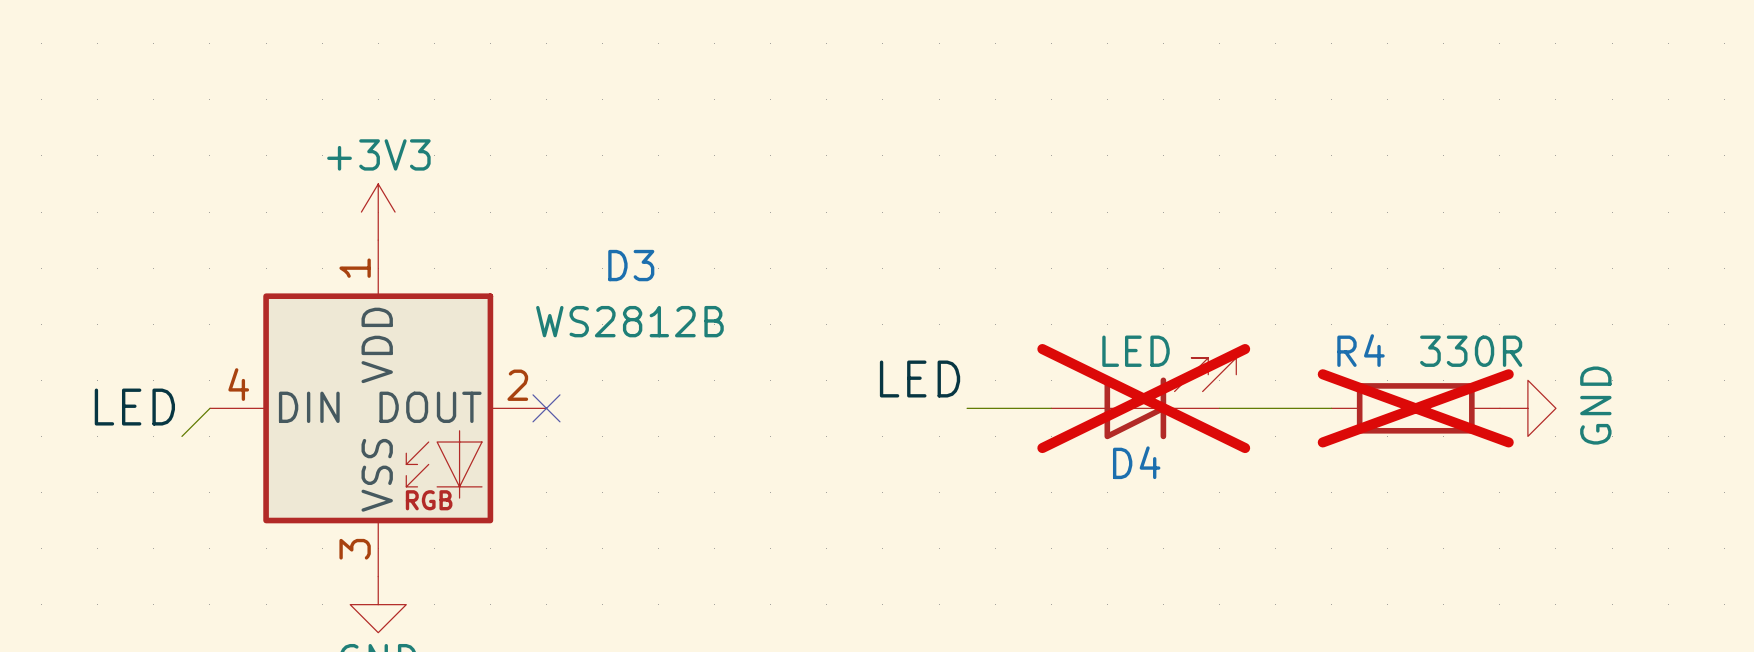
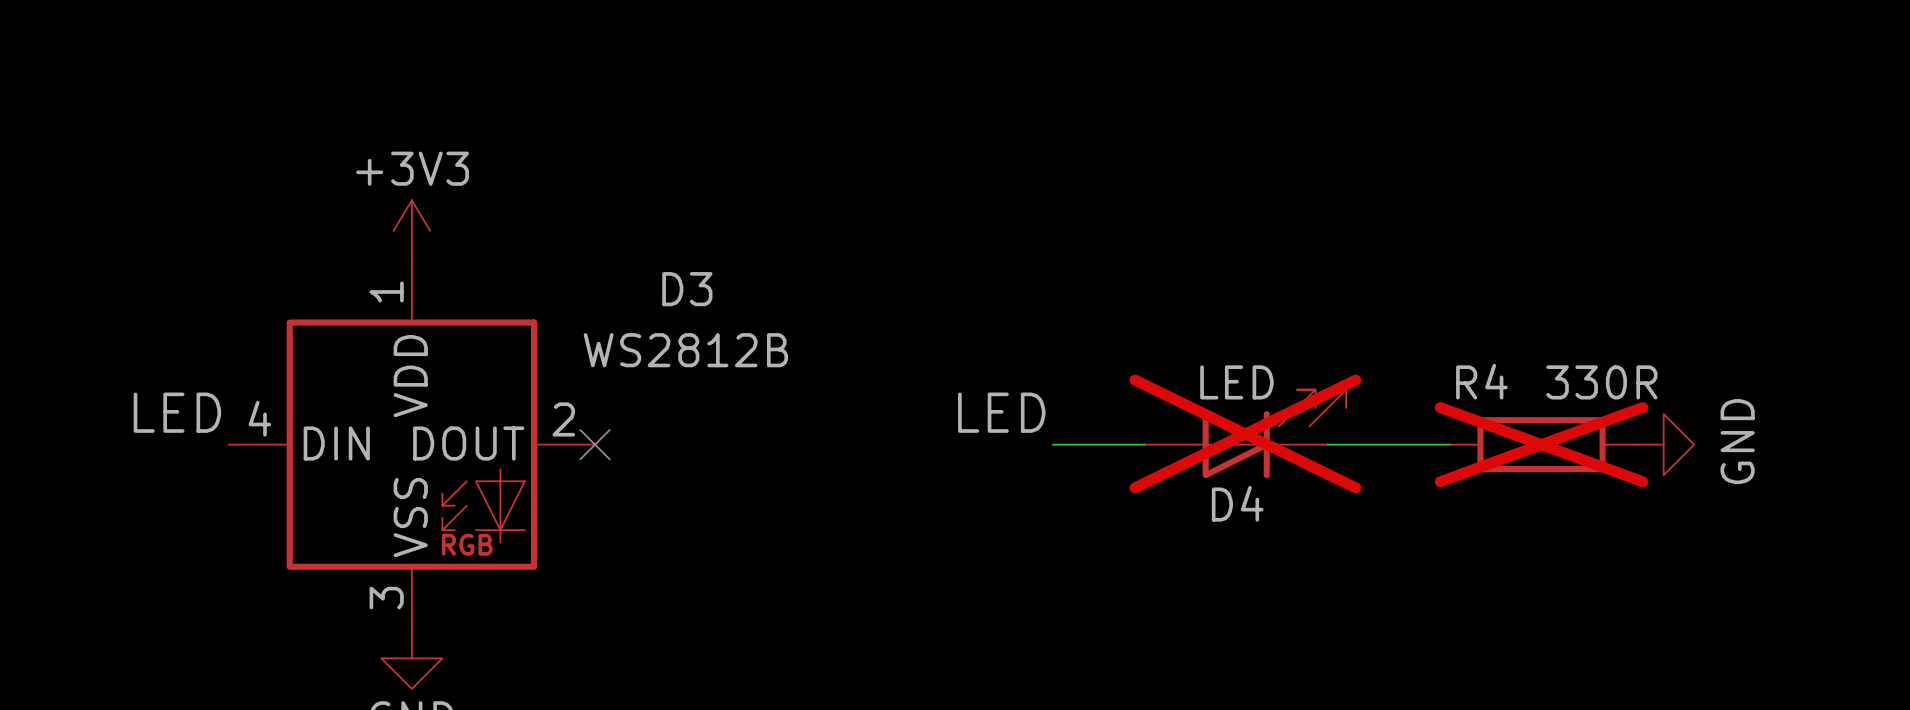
label position: LED (134, 407) -> LED (177, 412)
wire: (209, 408) (181, 436) -> none

